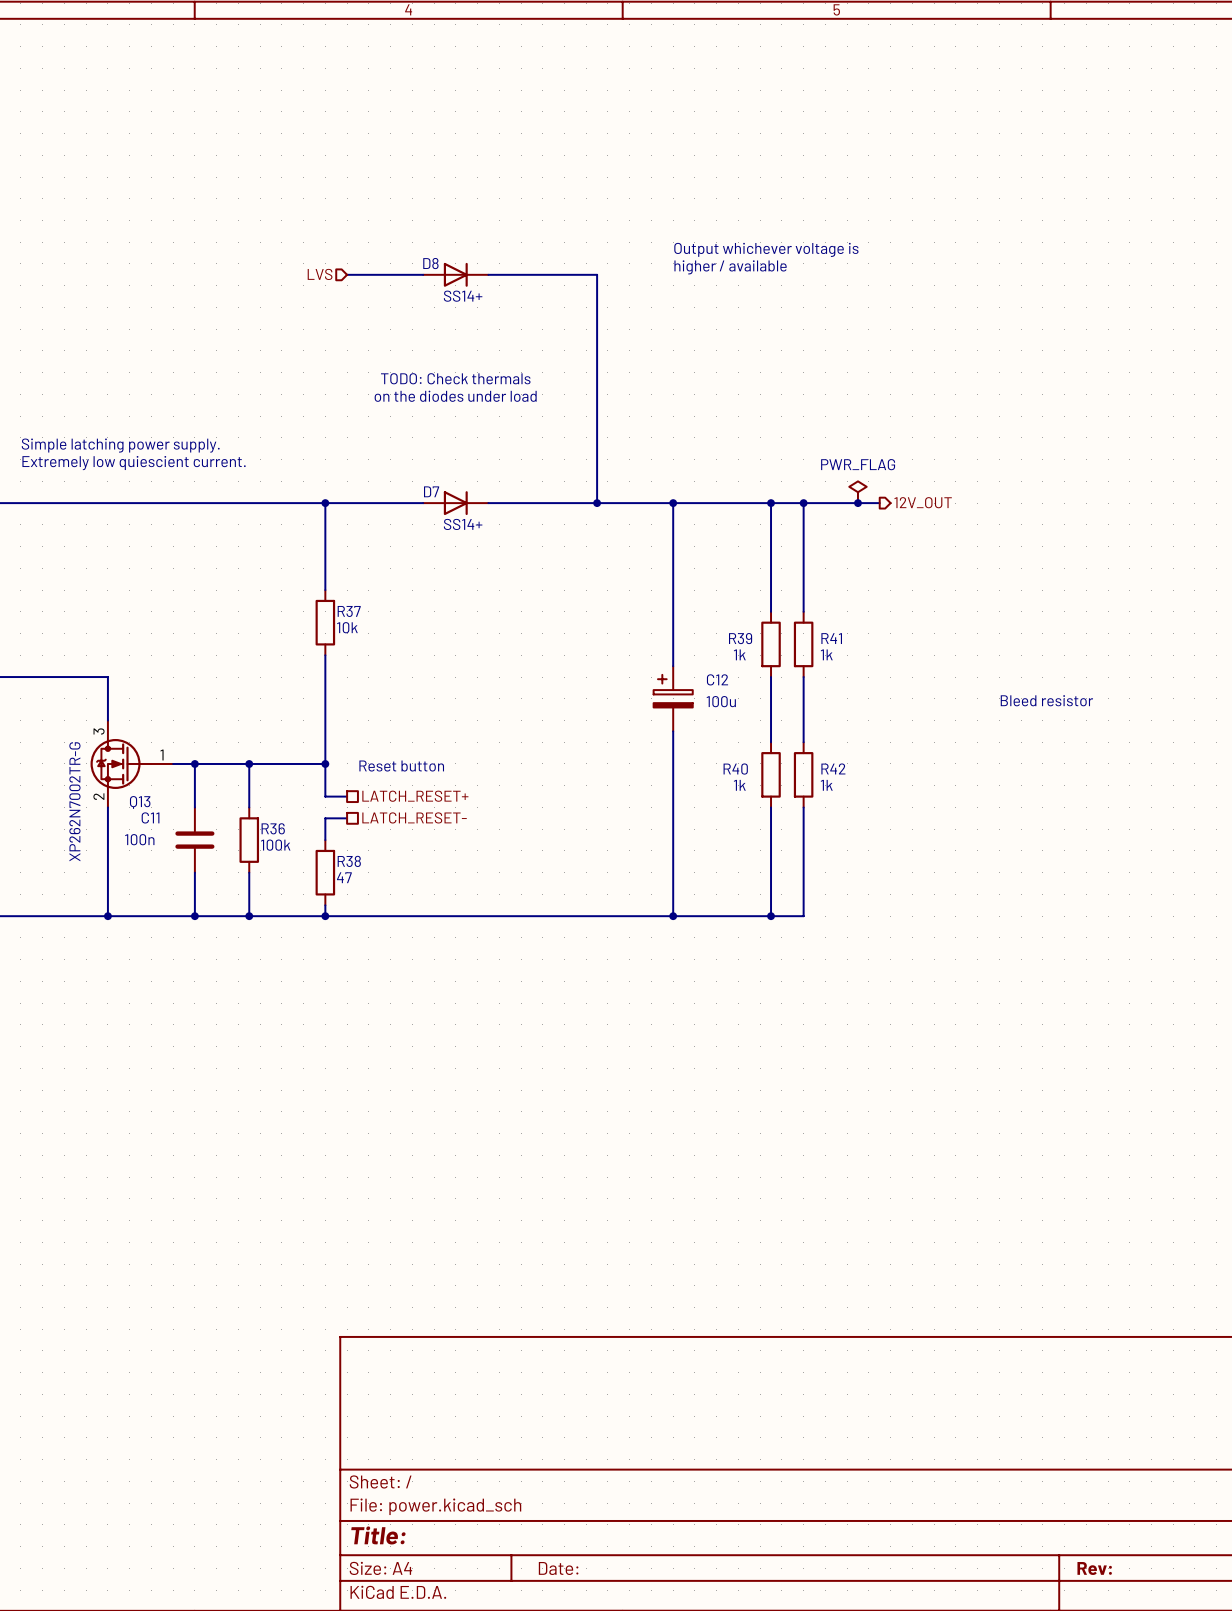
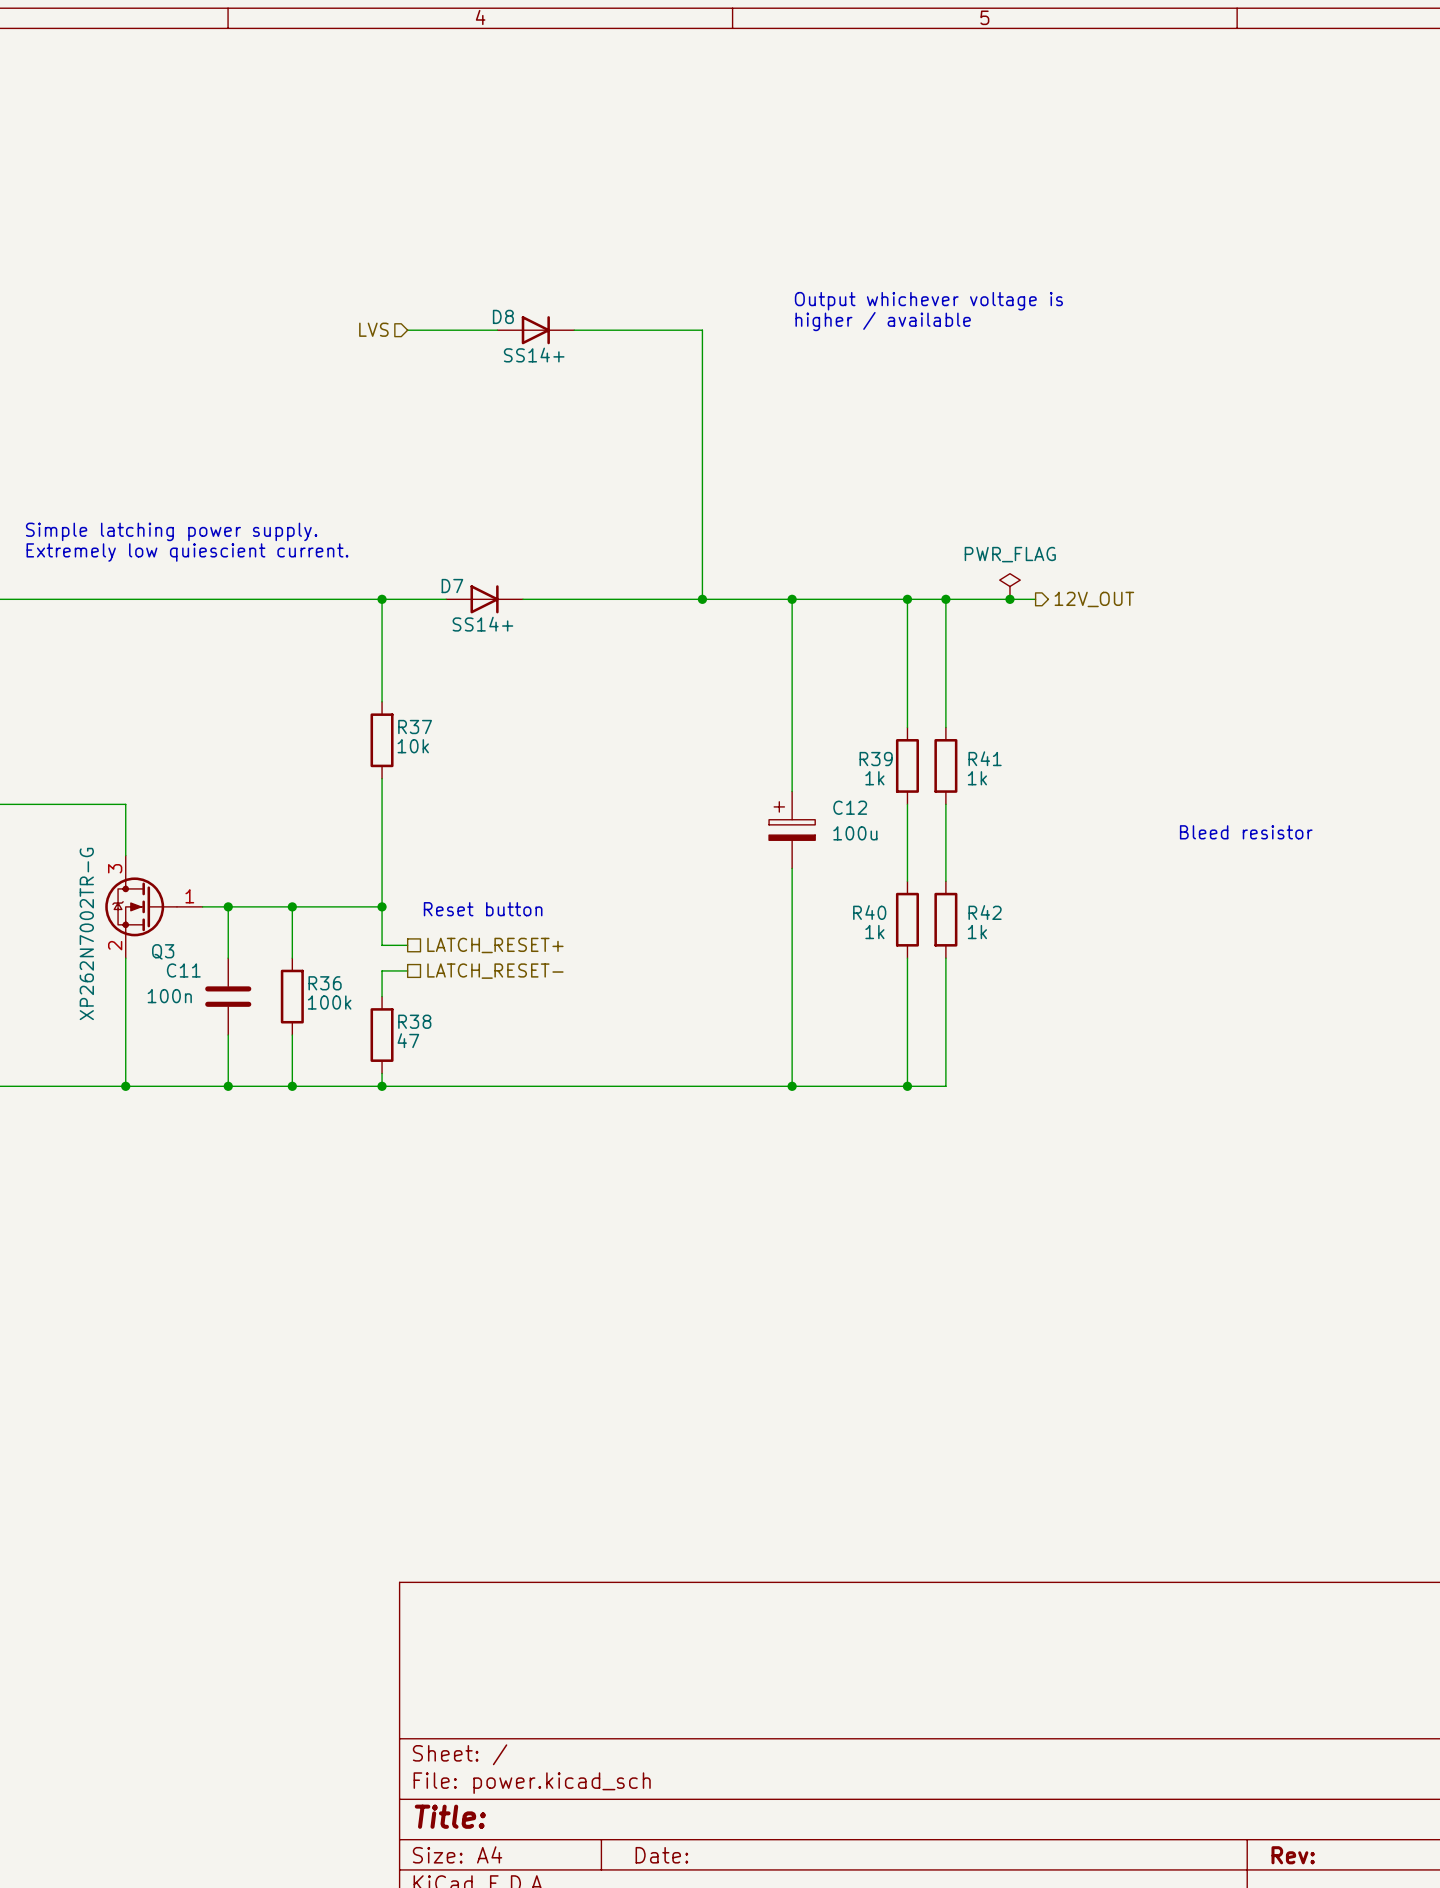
text: TODO: Check thermals (455, 378) -> none
text: on the diodes under load (455, 396) -> none
D7 position: (455, 503) -> (484, 599)
Q13 name: Q13 (140, 802) -> Q3 (163, 951)

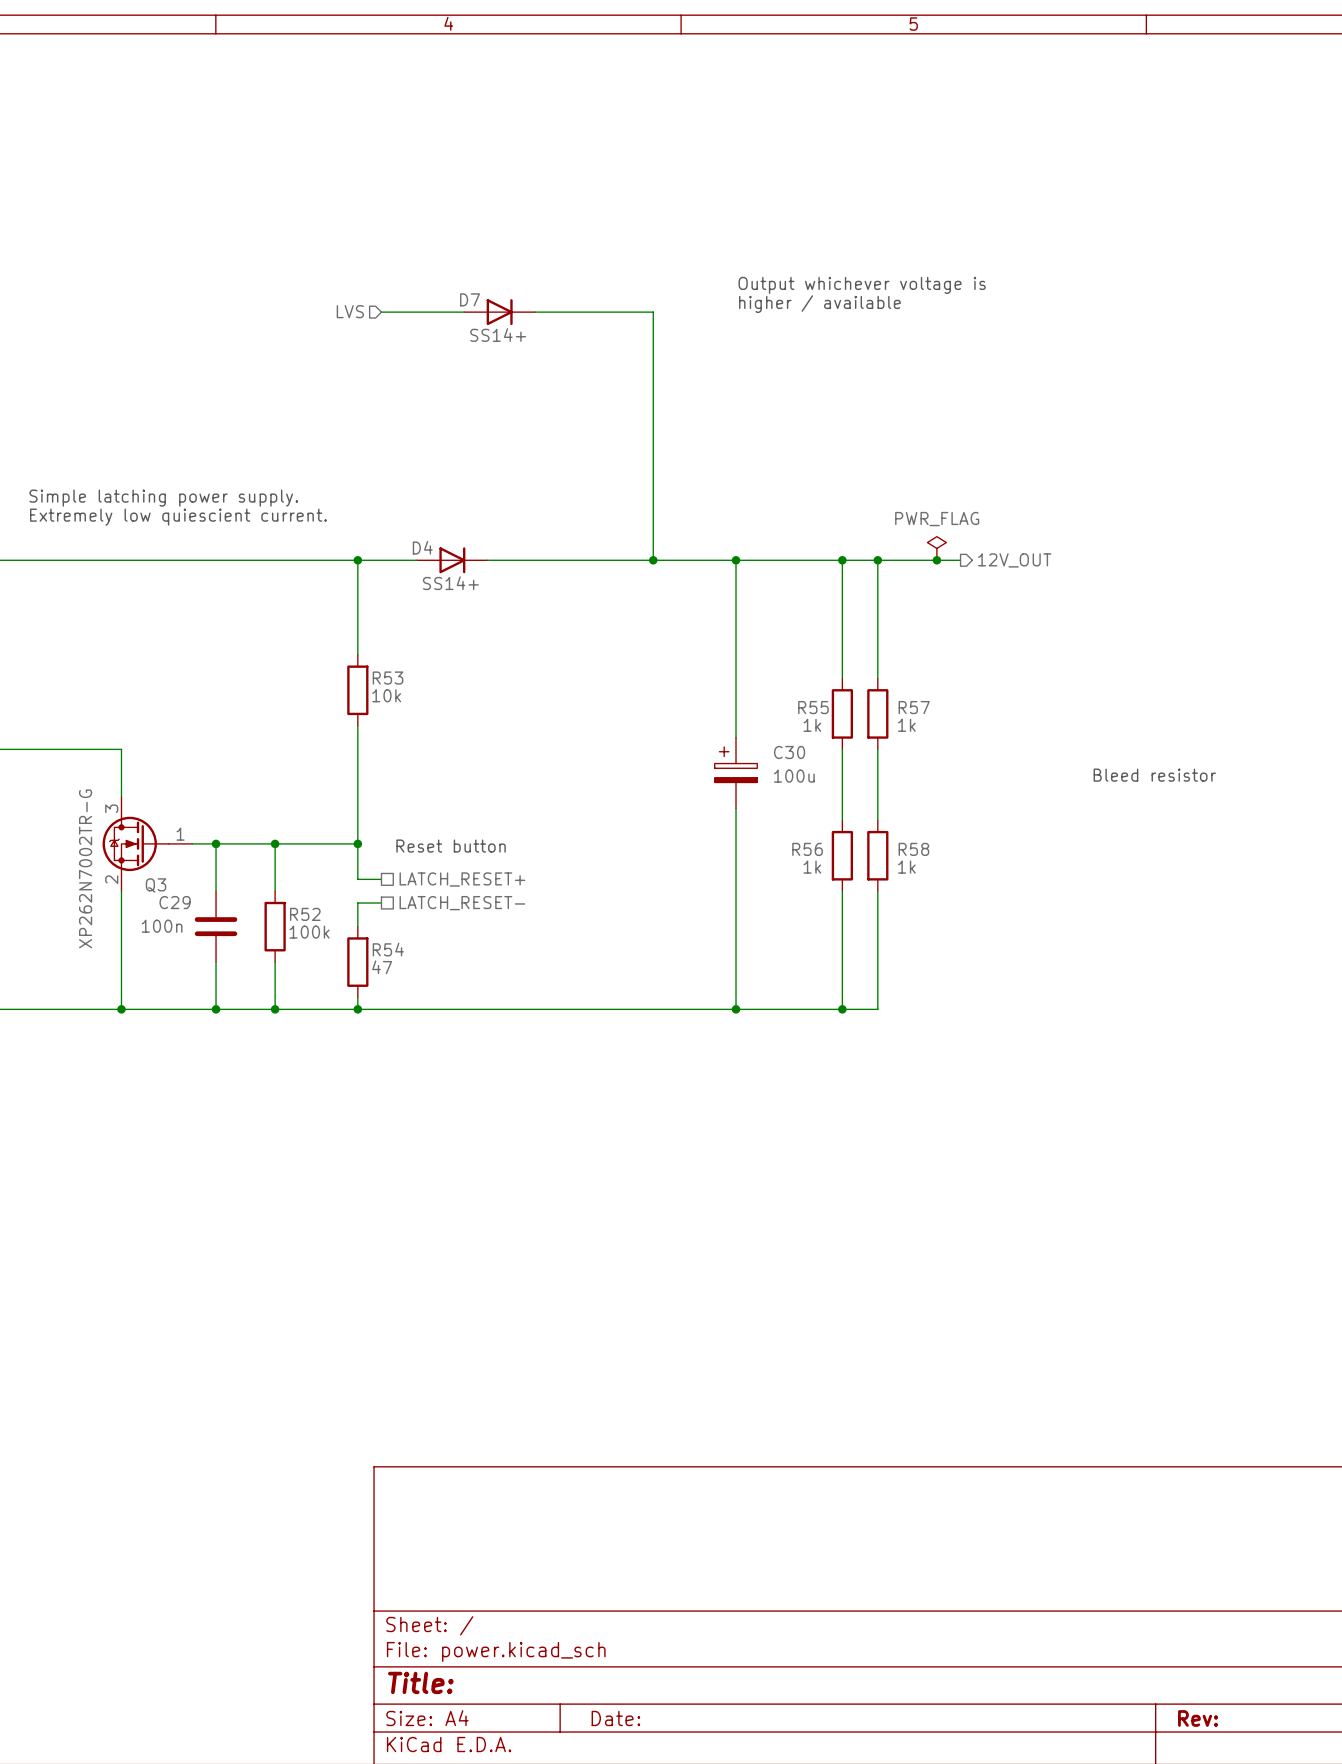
D8 name: D8 (503, 316) -> D7 (470, 299)
D7 name: D7 (452, 586) -> D4 (422, 547)
R37 name: R37 (415, 727) -> R53 (388, 678)
R41 name: R41 (985, 758) -> R57 (914, 707)
R39 name: R39 (876, 759) -> R55 (813, 707)
C12 name: C12 (850, 807) -> C30 (789, 752)
R40 name: R40 (869, 912) -> R56 (807, 849)
R42 name: R42 (985, 912) -> R58 (913, 849)
C11 name: C11 (183, 970) -> C29 (175, 902)
R36 name: R36 (325, 983) -> R52 (305, 914)
R38 name: R38 (414, 1021) -> R54 (388, 949)

